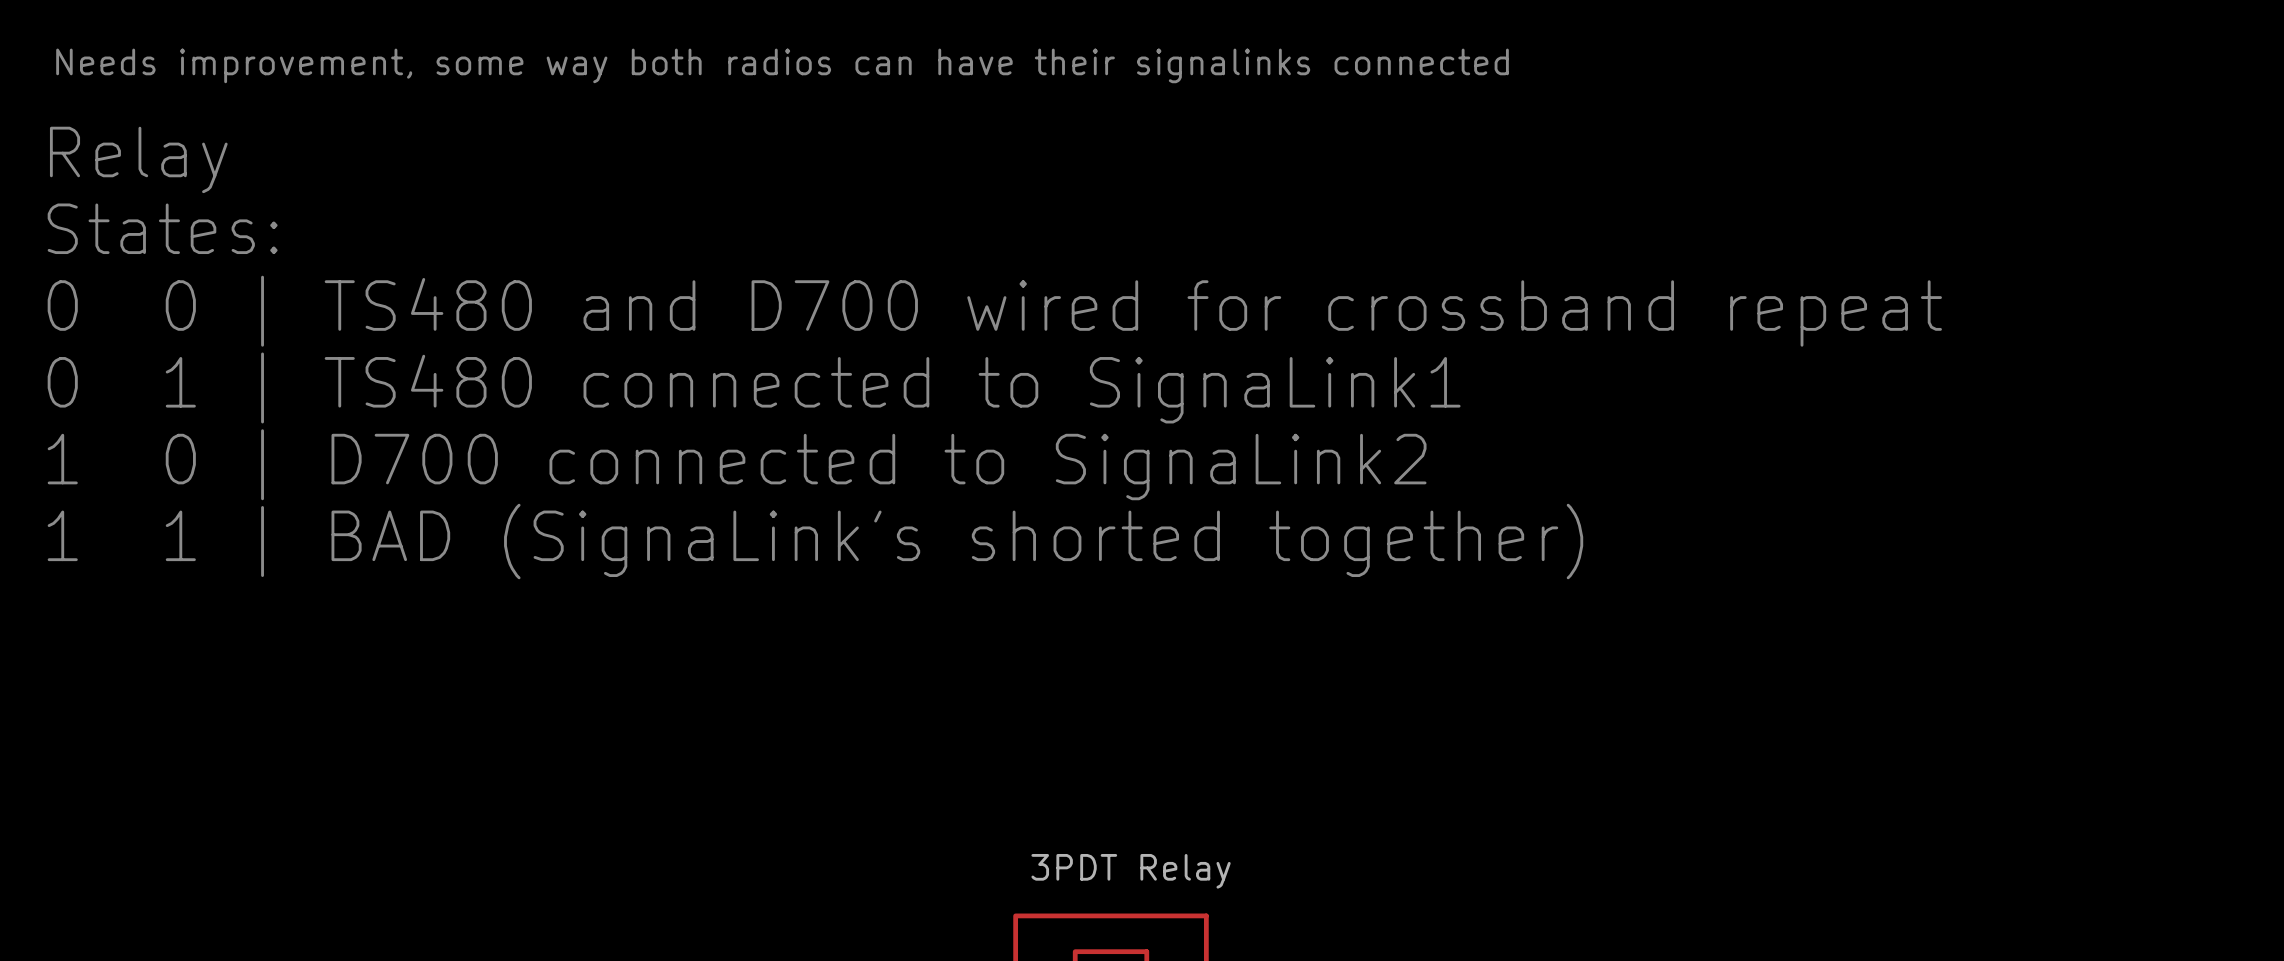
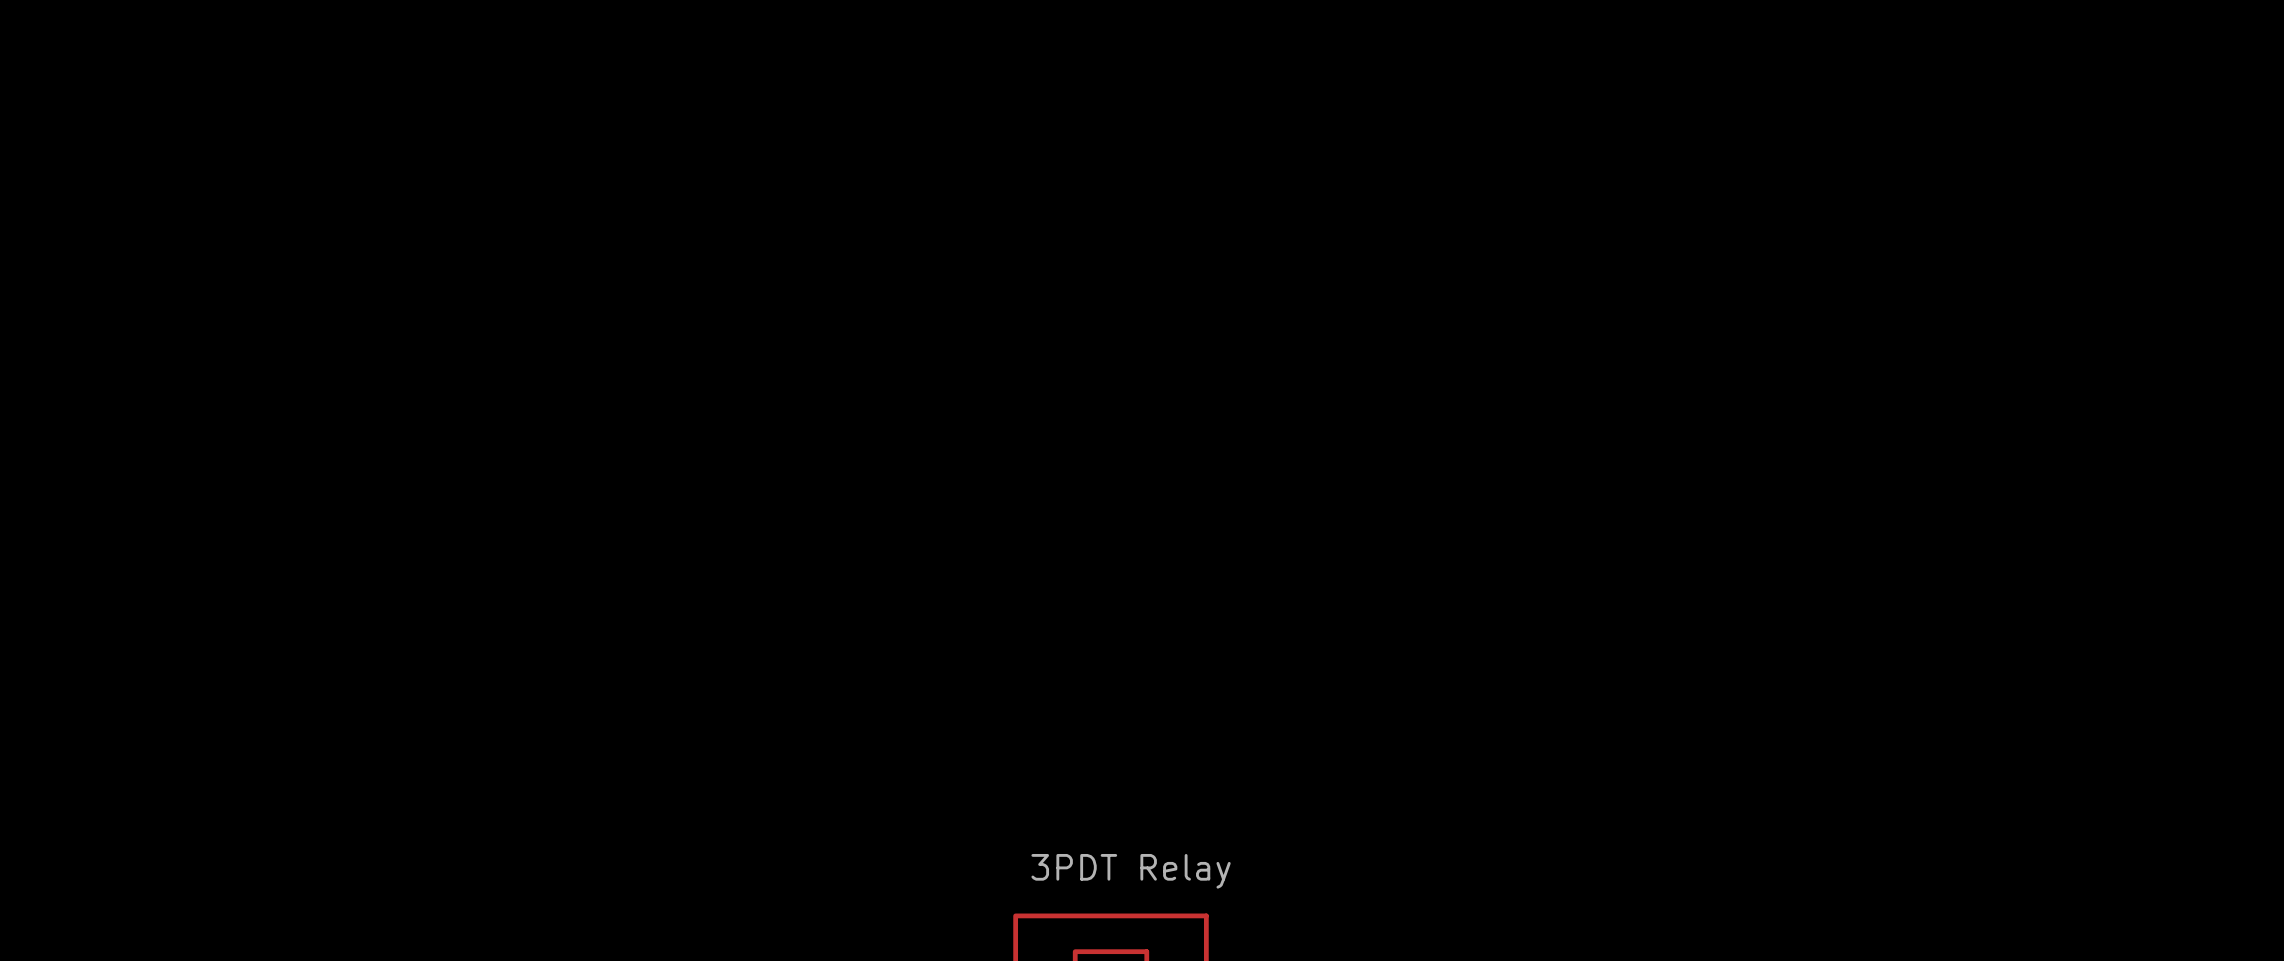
text: Needs improvement, some way both radios can have their signalinks connected (782, 65) -> none
text: Relay (138, 159) -> none
text: States: (162, 228) -> none
text: 0 0 | TS480 and D700 wired for crossband repeat (994, 311) -> none
text: 0 1 | TS480 connected to SignaLink1 (754, 387) -> none
text: 1 0 | D700 connected to SignaLink2 (737, 464) -> none
text: 1 1 | BAD (SignaLink's shorted together) (815, 541) -> none

